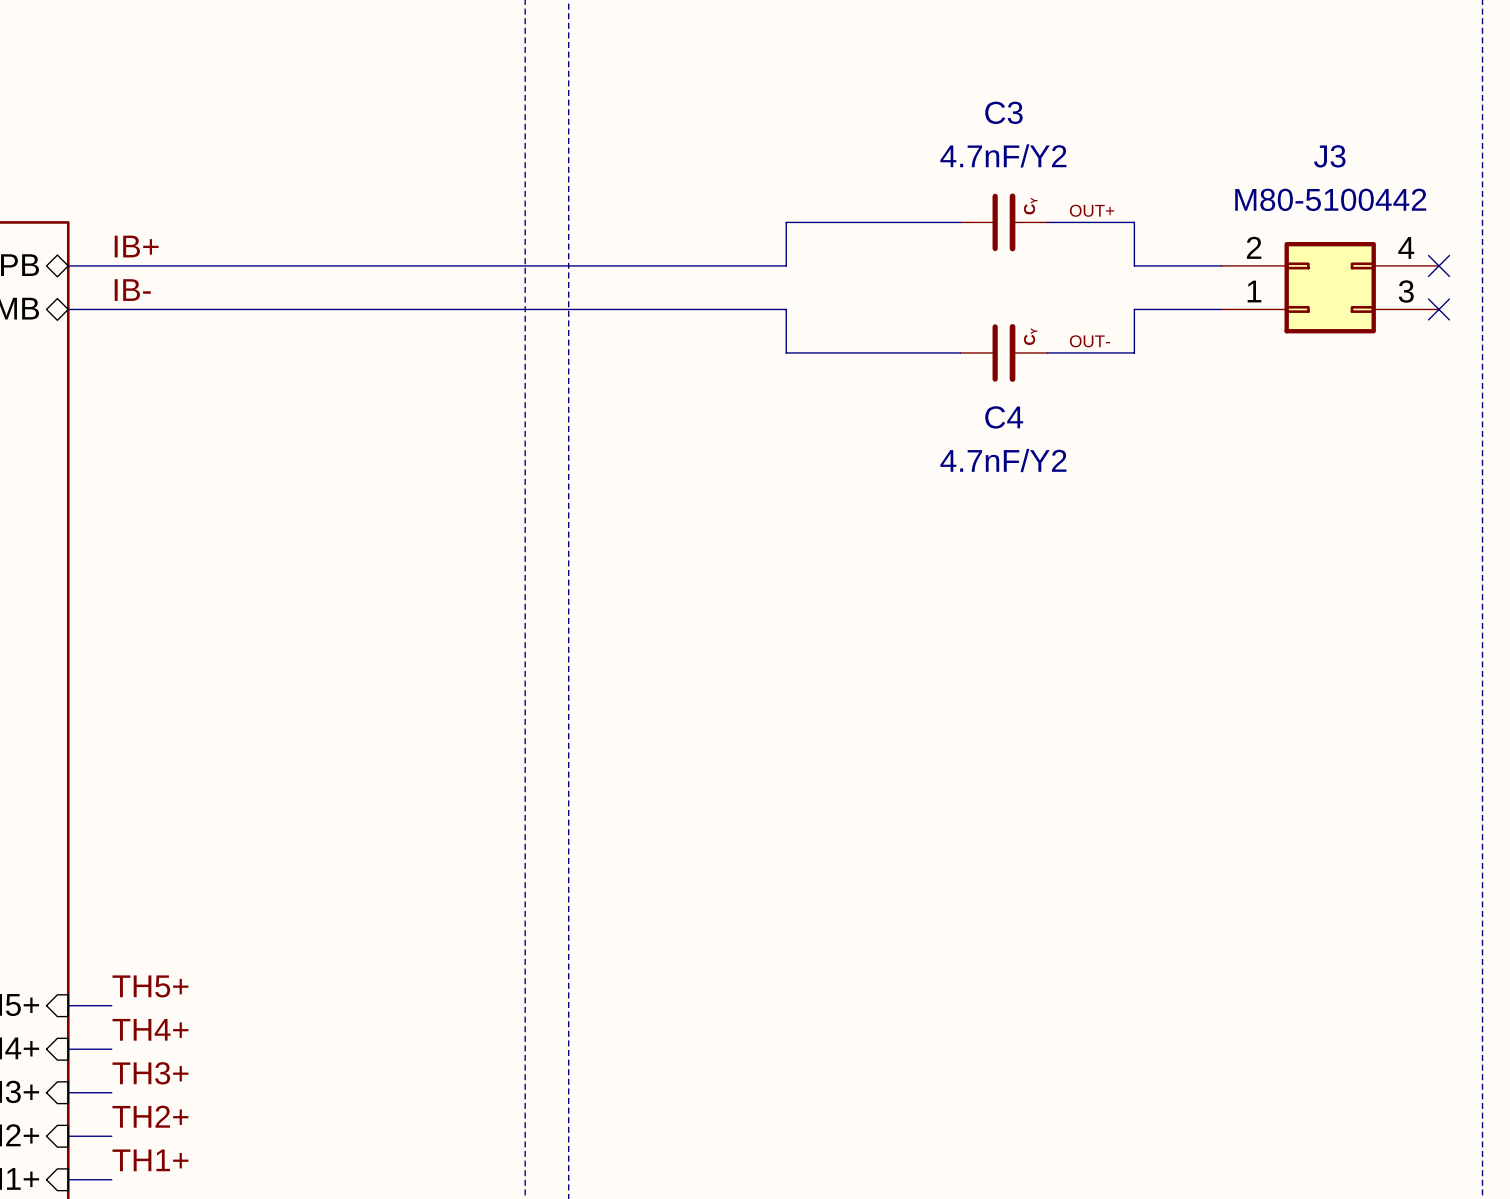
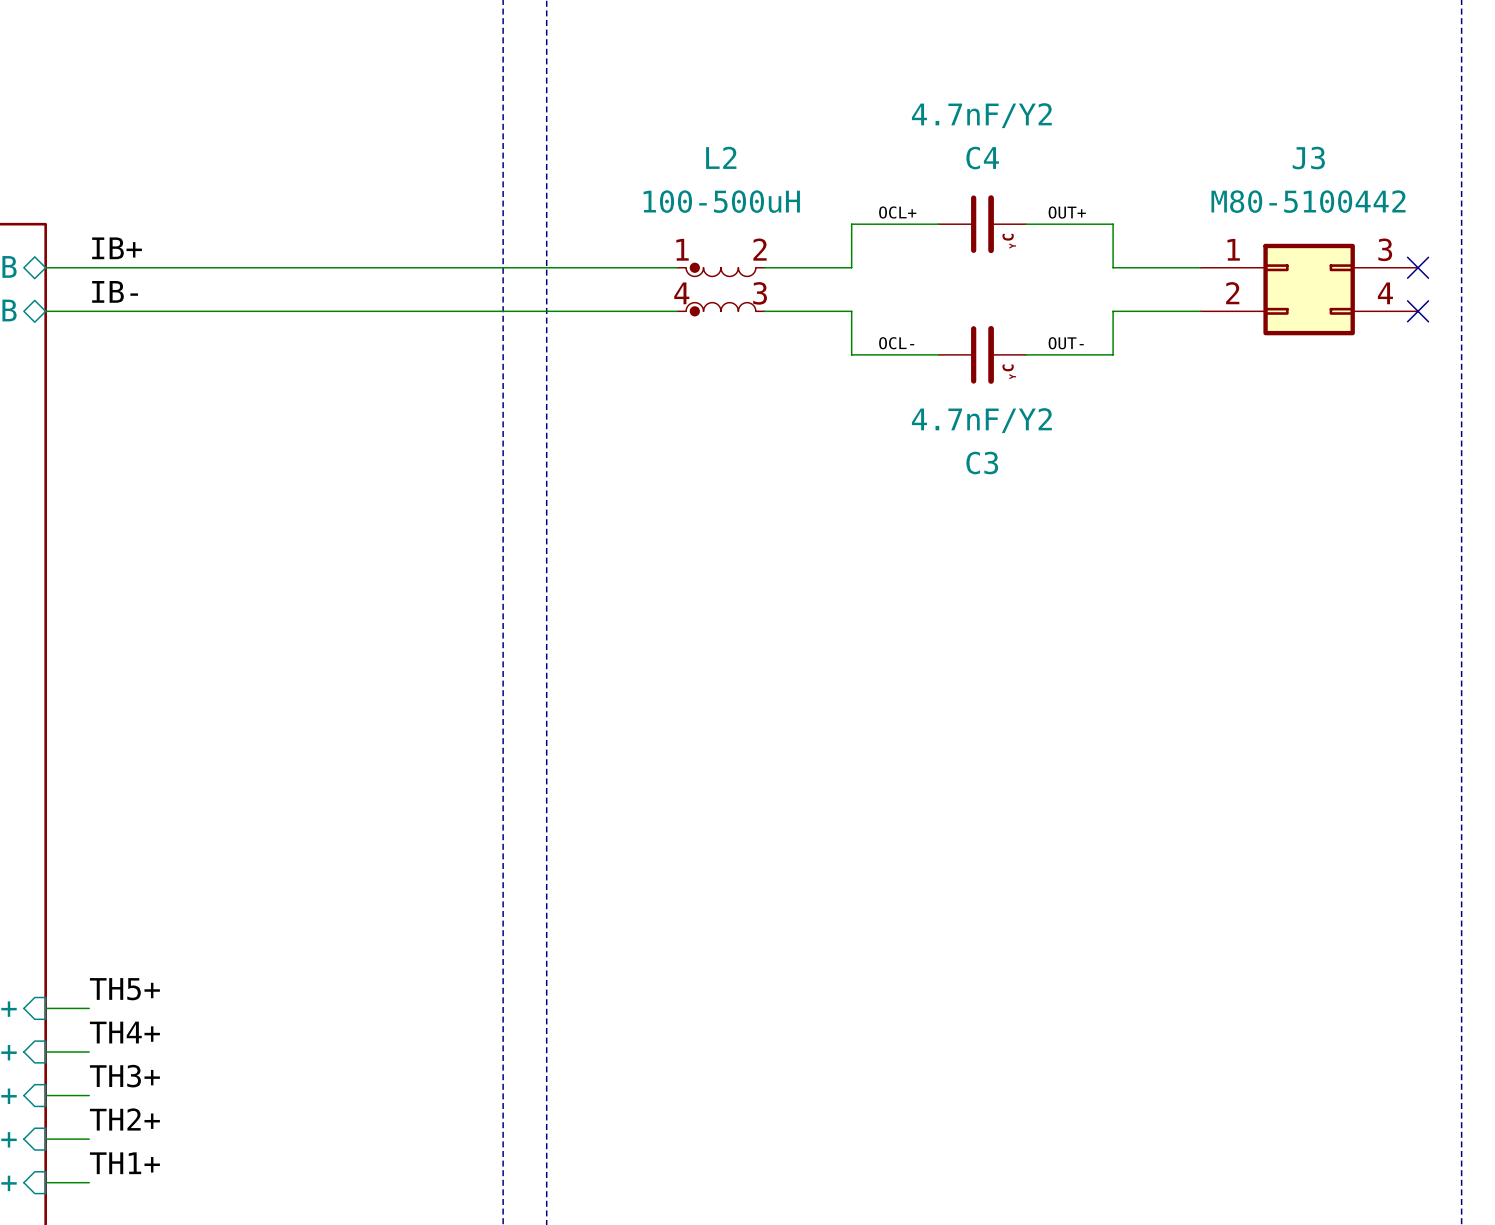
label: none -> OCL+ (897, 212)
wire: (873, 222) (786, 222) (786, 265) (699, 265) -> (851, 224) (851, 267) (764, 267)
C3 flip: as is (1003, 222) -> up-down (982, 354)
C3 position: (1003, 222) -> (982, 354)
L2: none -> 100-500uH (720, 289)
J3 flip: as is (1330, 287) -> up-down (1309, 289)
wire: (699, 309) (786, 309) (786, 352) (873, 352) -> (764, 311) (851, 311) (851, 354)
label: none -> OCL- (896, 343)
C4 flip: as is (1003, 352) -> up-down (982, 224)
C4 position: (1003, 352) -> (982, 224)

